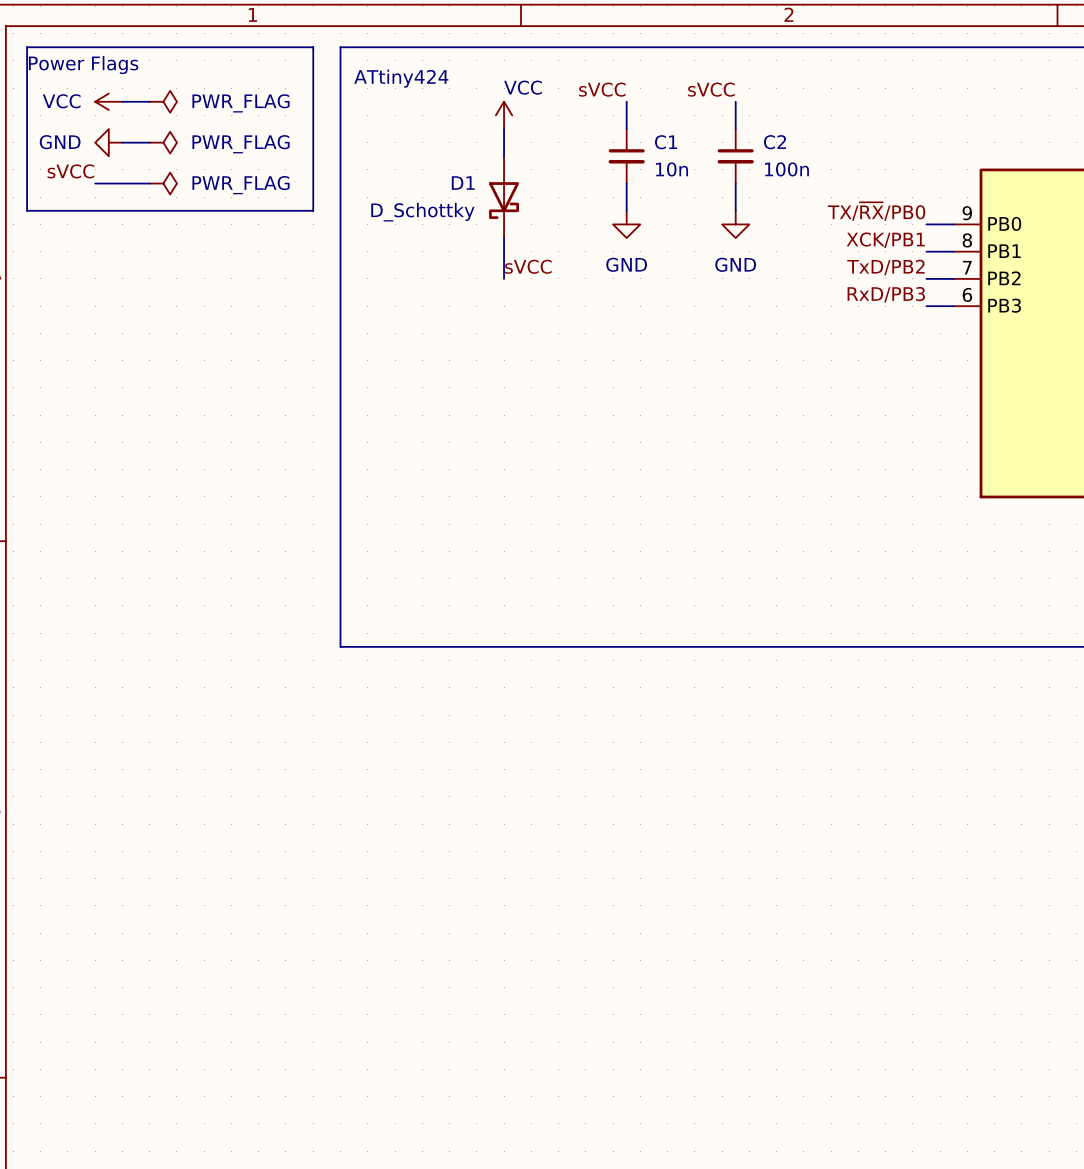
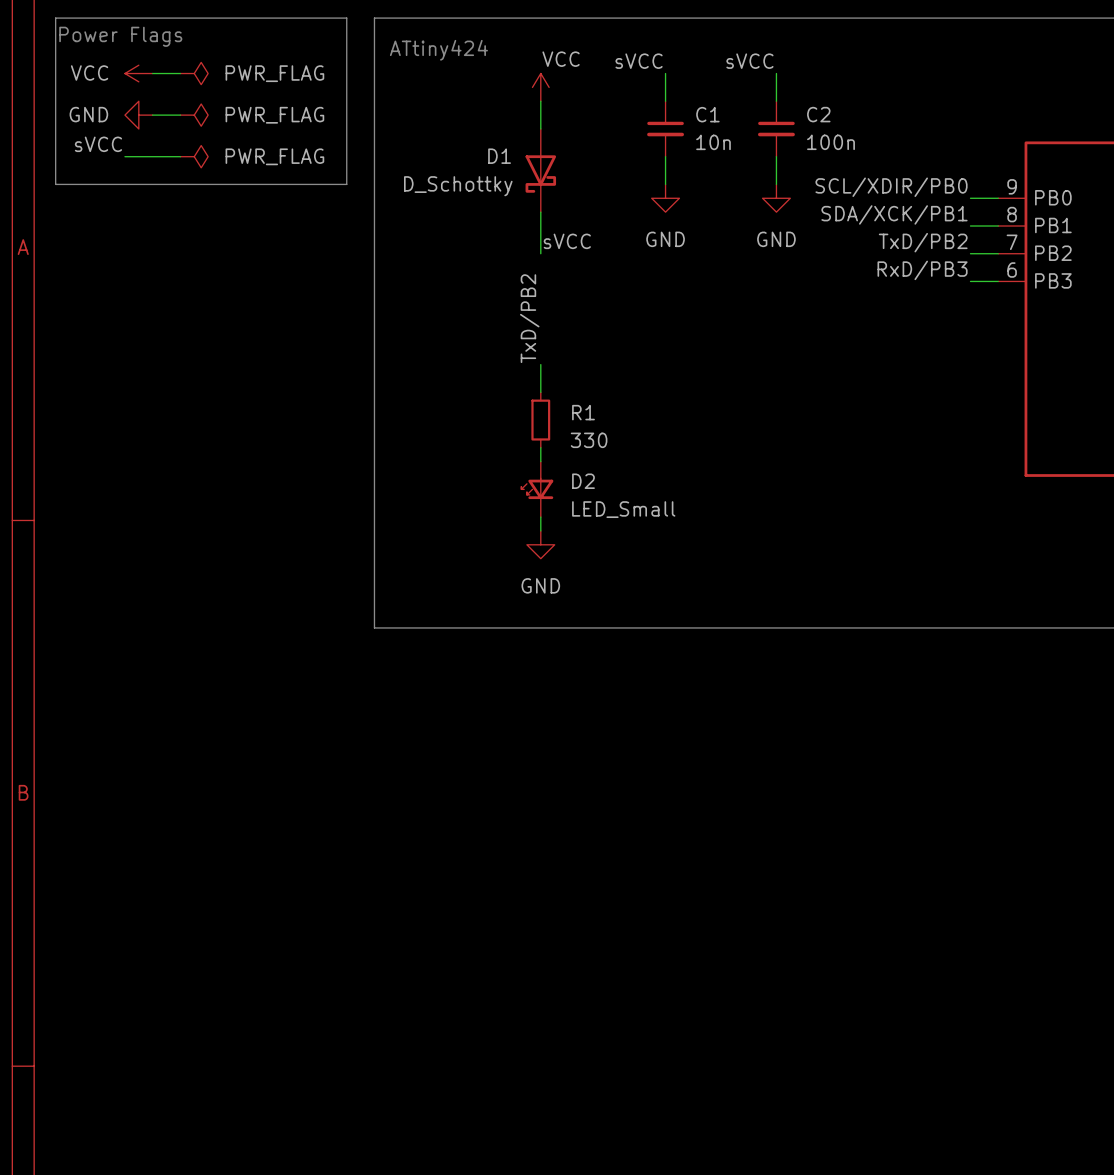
label: TX/~{RX}/PB0 (876, 211) -> SCL/XDIR/PB0 (891, 187)
label: XCK/PB1 (885, 240) -> SDA/XCK/PB1 (894, 214)
label: none -> TxD/PB2 (529, 318)
wire: none -> (540, 364) (540, 392)
R1: none -> 330 (540, 420)
wire: none -> (540, 447) (540, 461)
D2: none -> LED_Small (537, 489)
wire: none -> (540, 517) (540, 530)
power symbol: none -> GND (540, 544)

